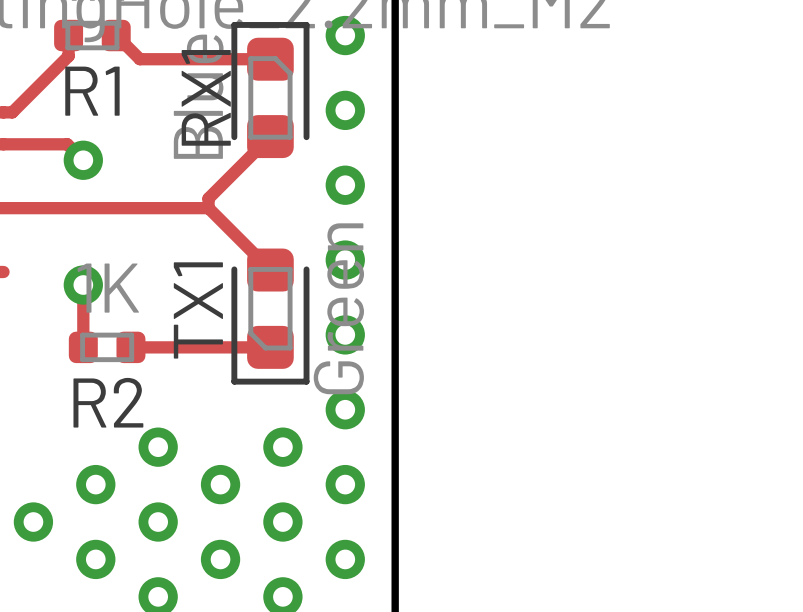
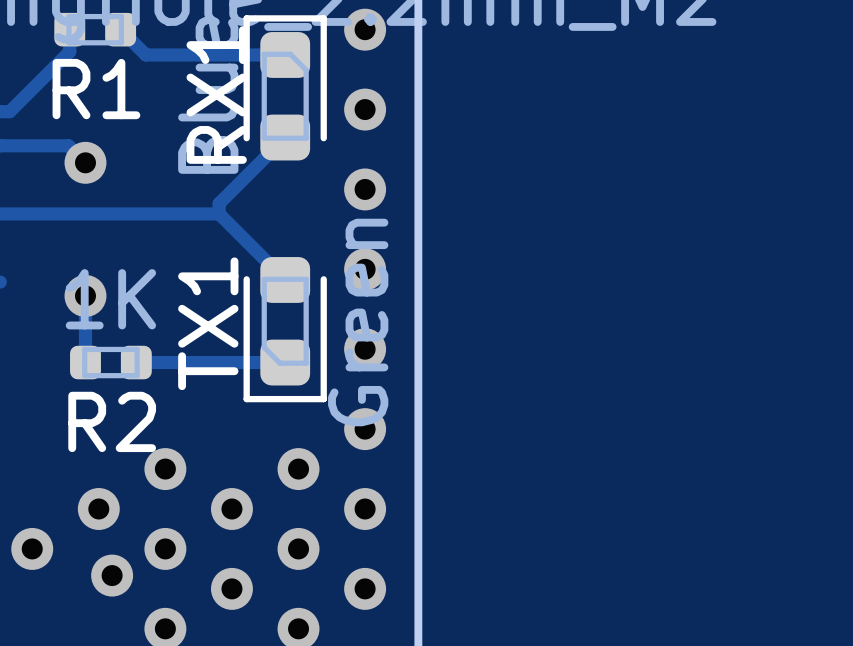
via position: (95, 559) -> (112, 575)

